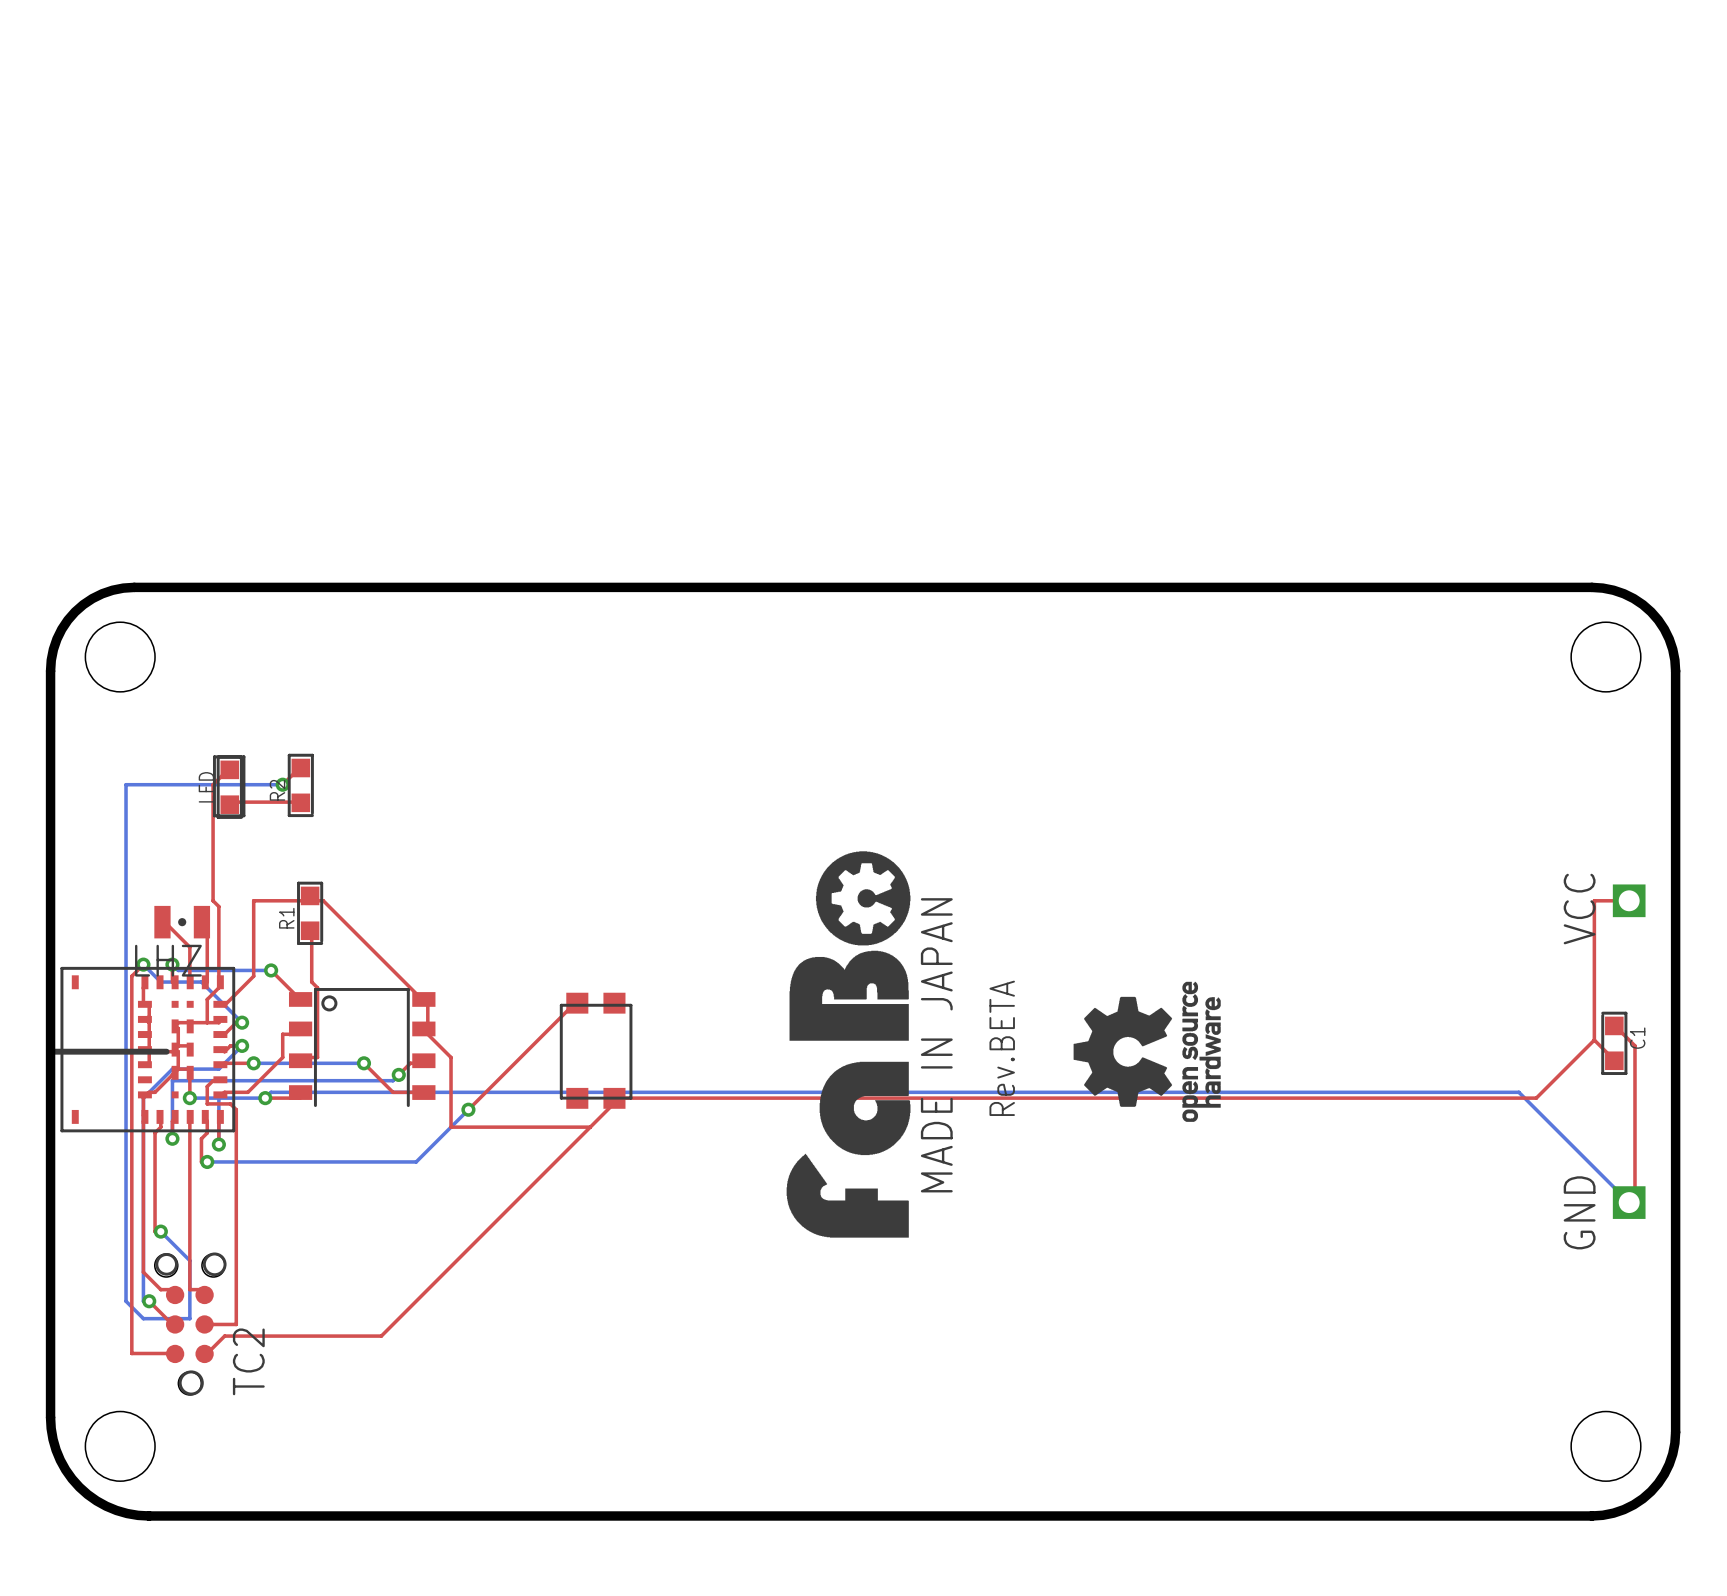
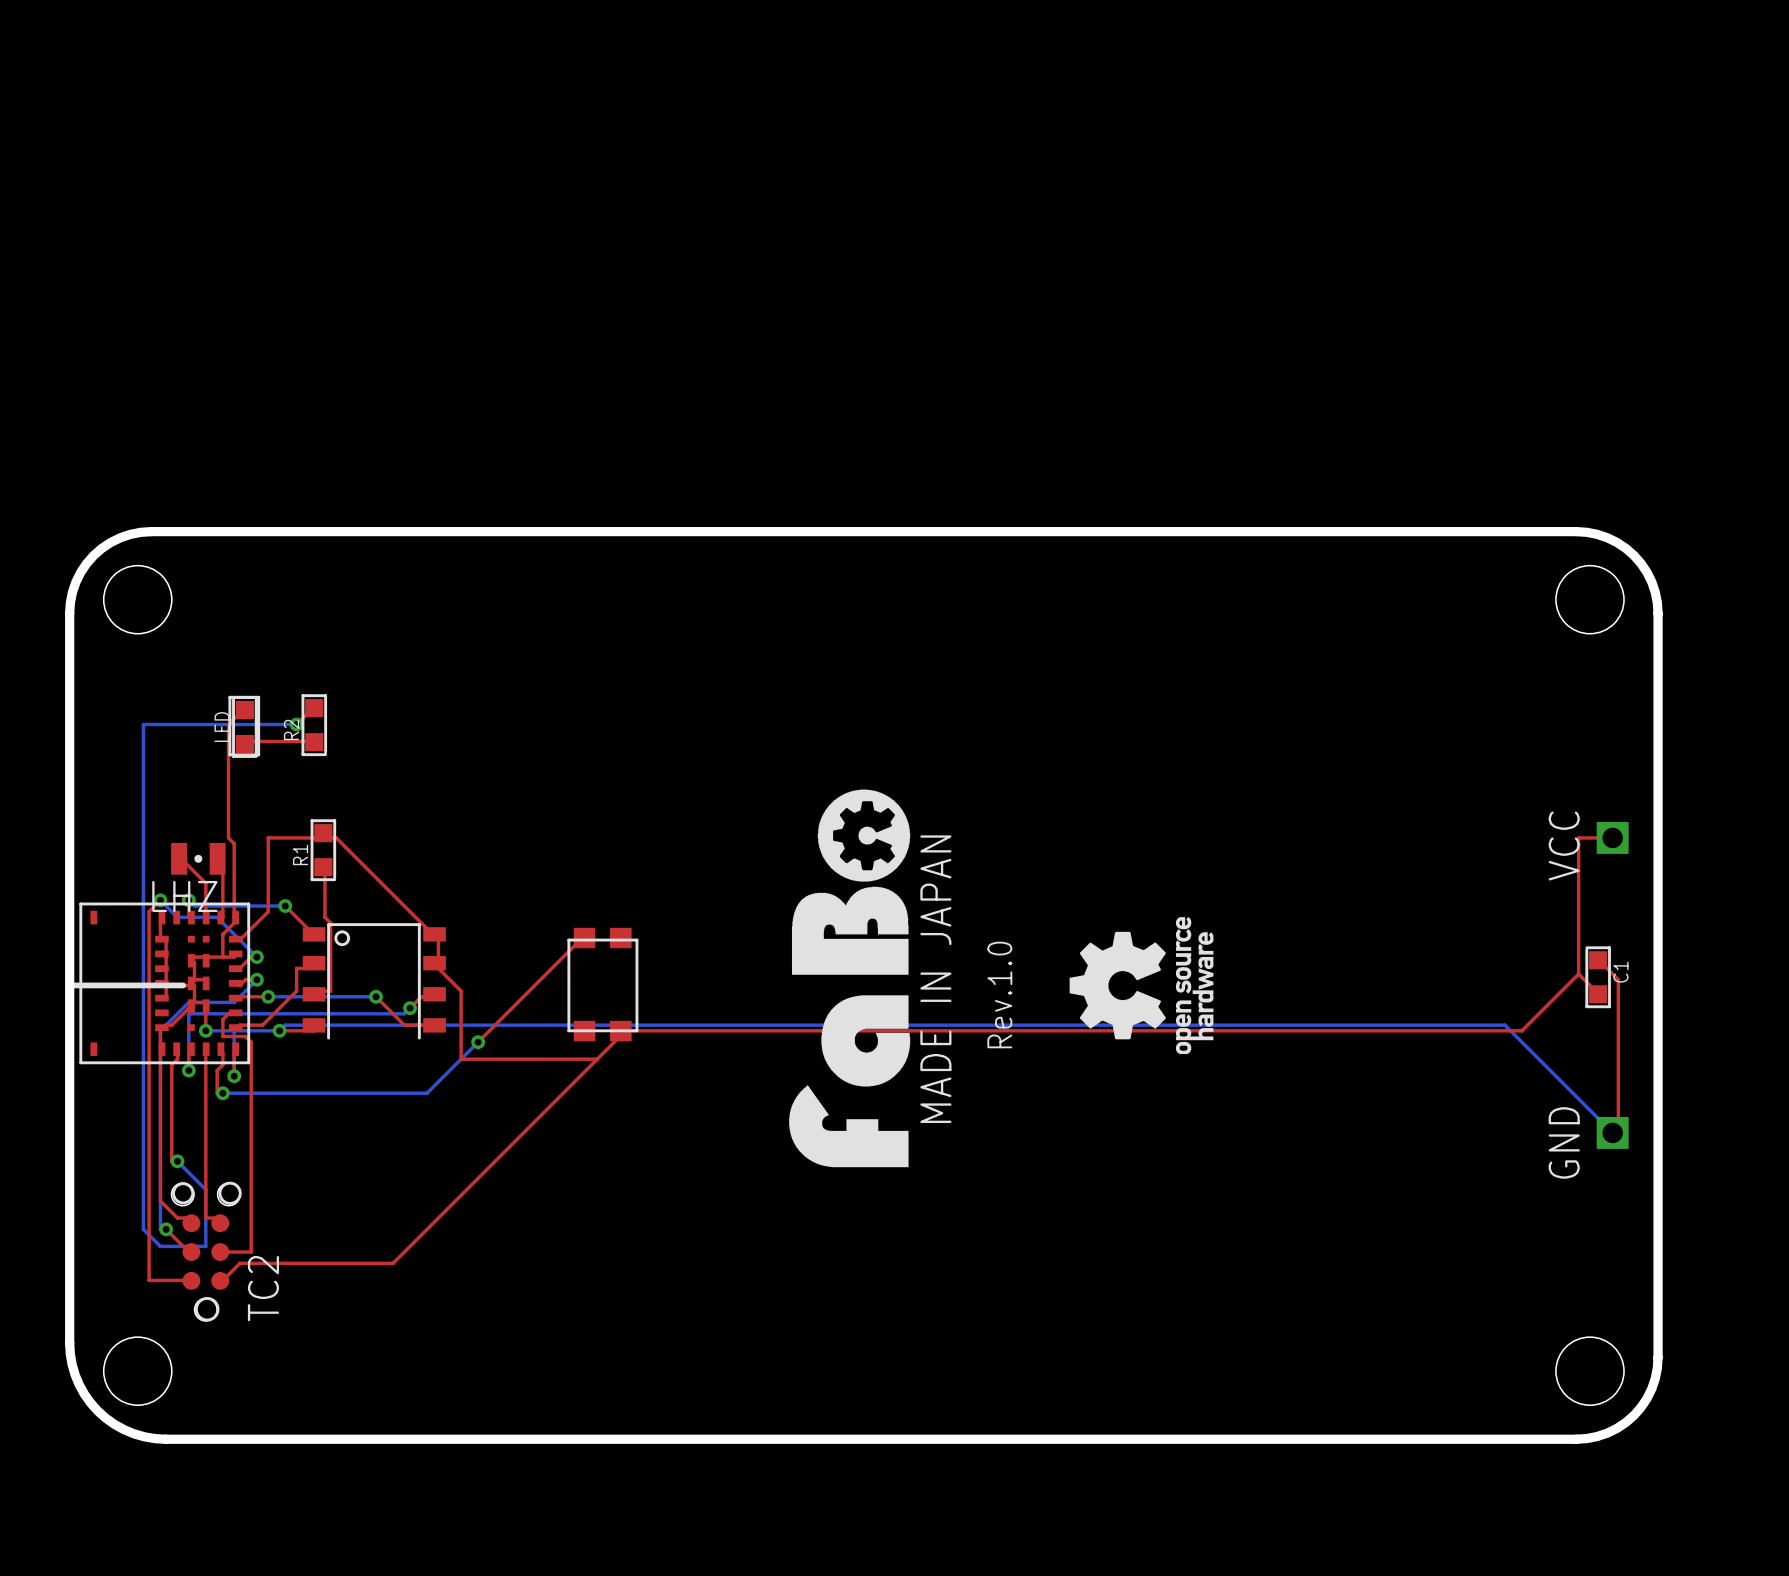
text: Rev.BETA (1002, 1048) -> Rev.1.0 (999, 994)

